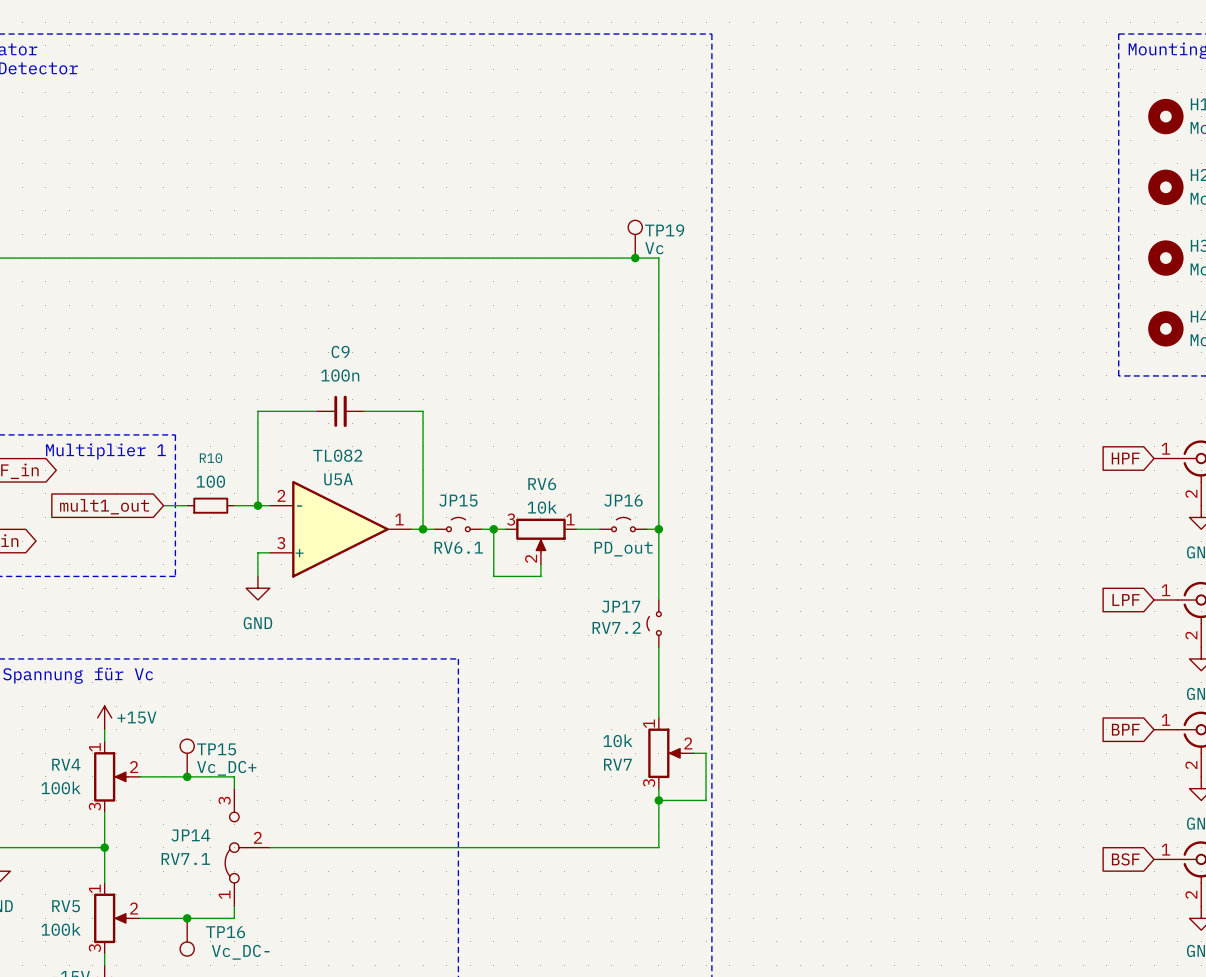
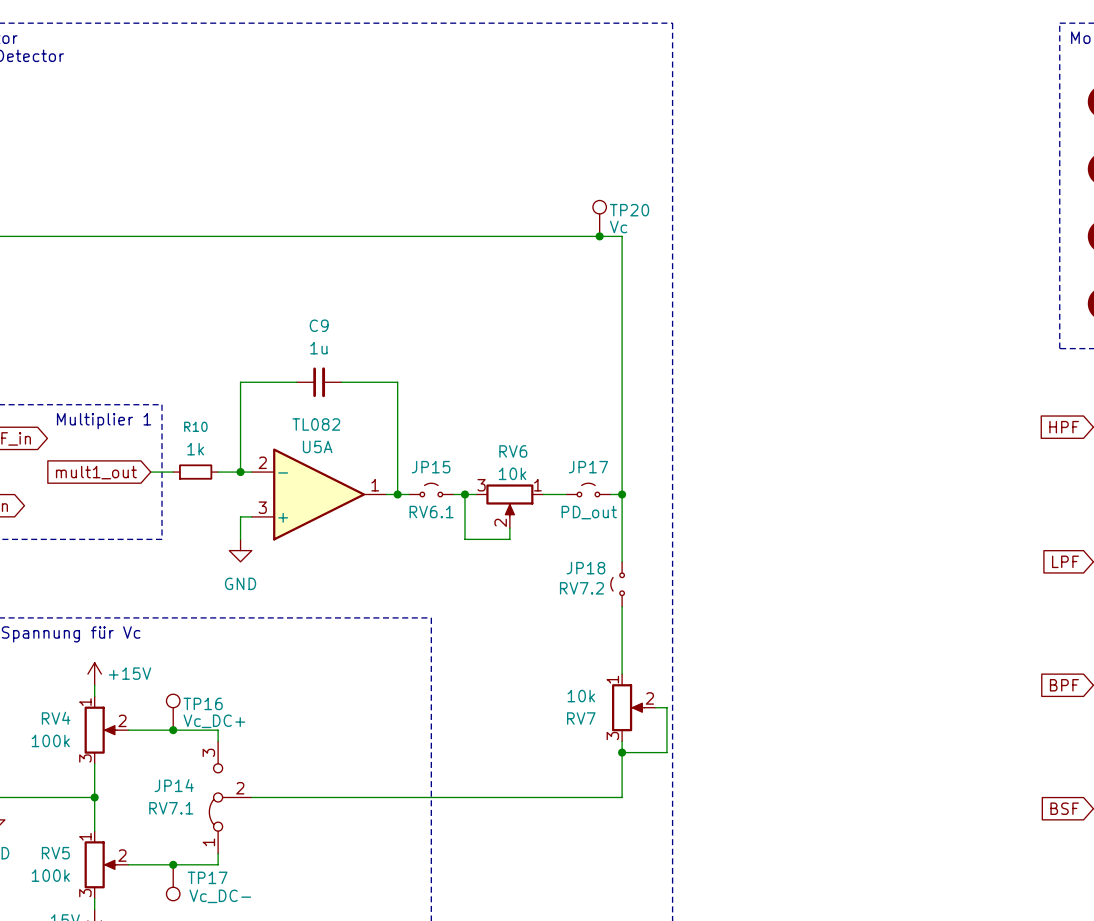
TP19 name: TP19 (664, 230) -> TP20 (629, 210)
C9 value: 100n (340, 375) -> 1u (318, 348)
R10 value: 100 (210, 481) -> 1k (195, 449)
JP16 name: JP16 (623, 500) -> JP17 (588, 467)
JP17 name: JP17 (621, 606) -> JP18 (585, 568)
TP15 name: TP15 (216, 749) -> TP16 (203, 703)
TP16 name: TP16 (225, 932) -> TP17 (207, 877)

